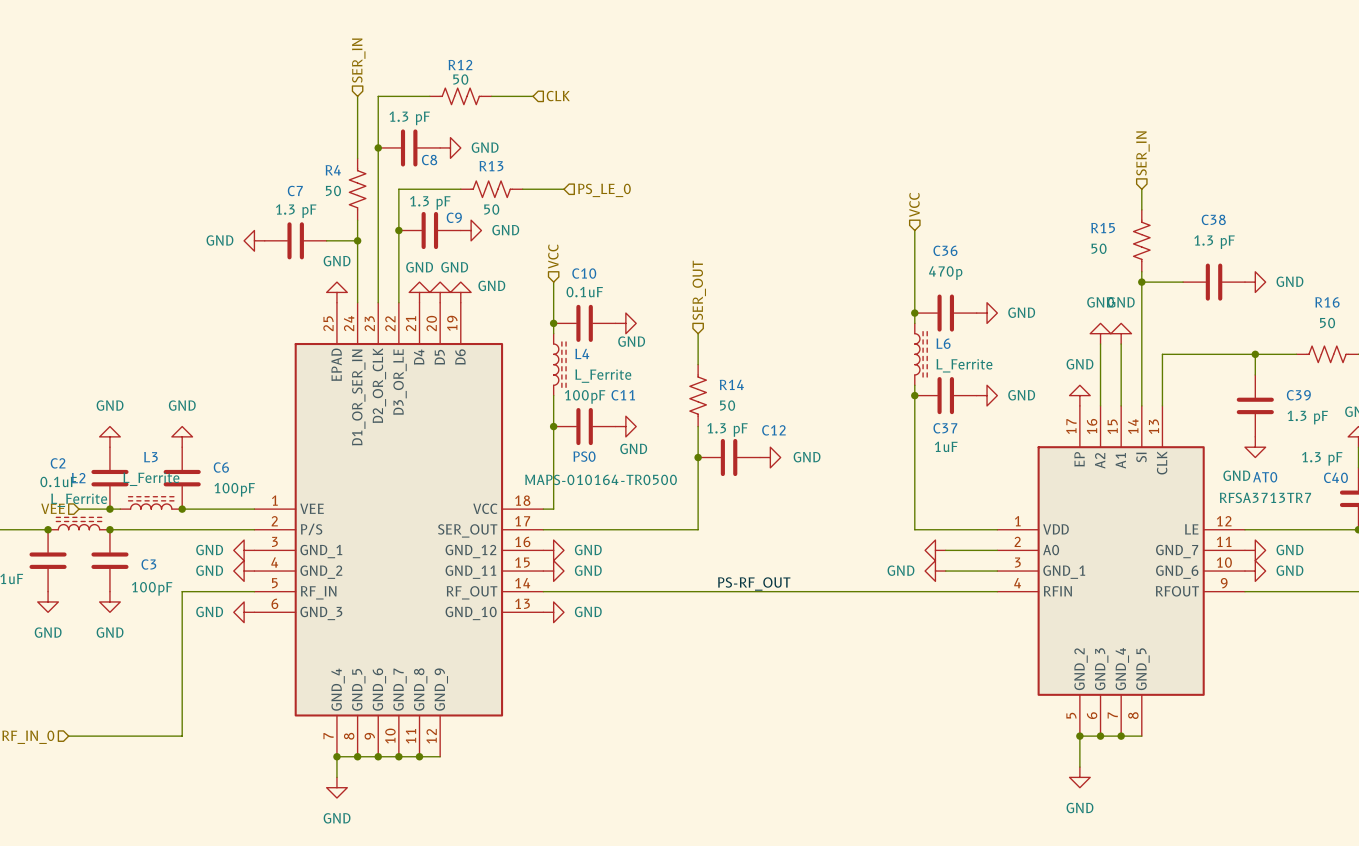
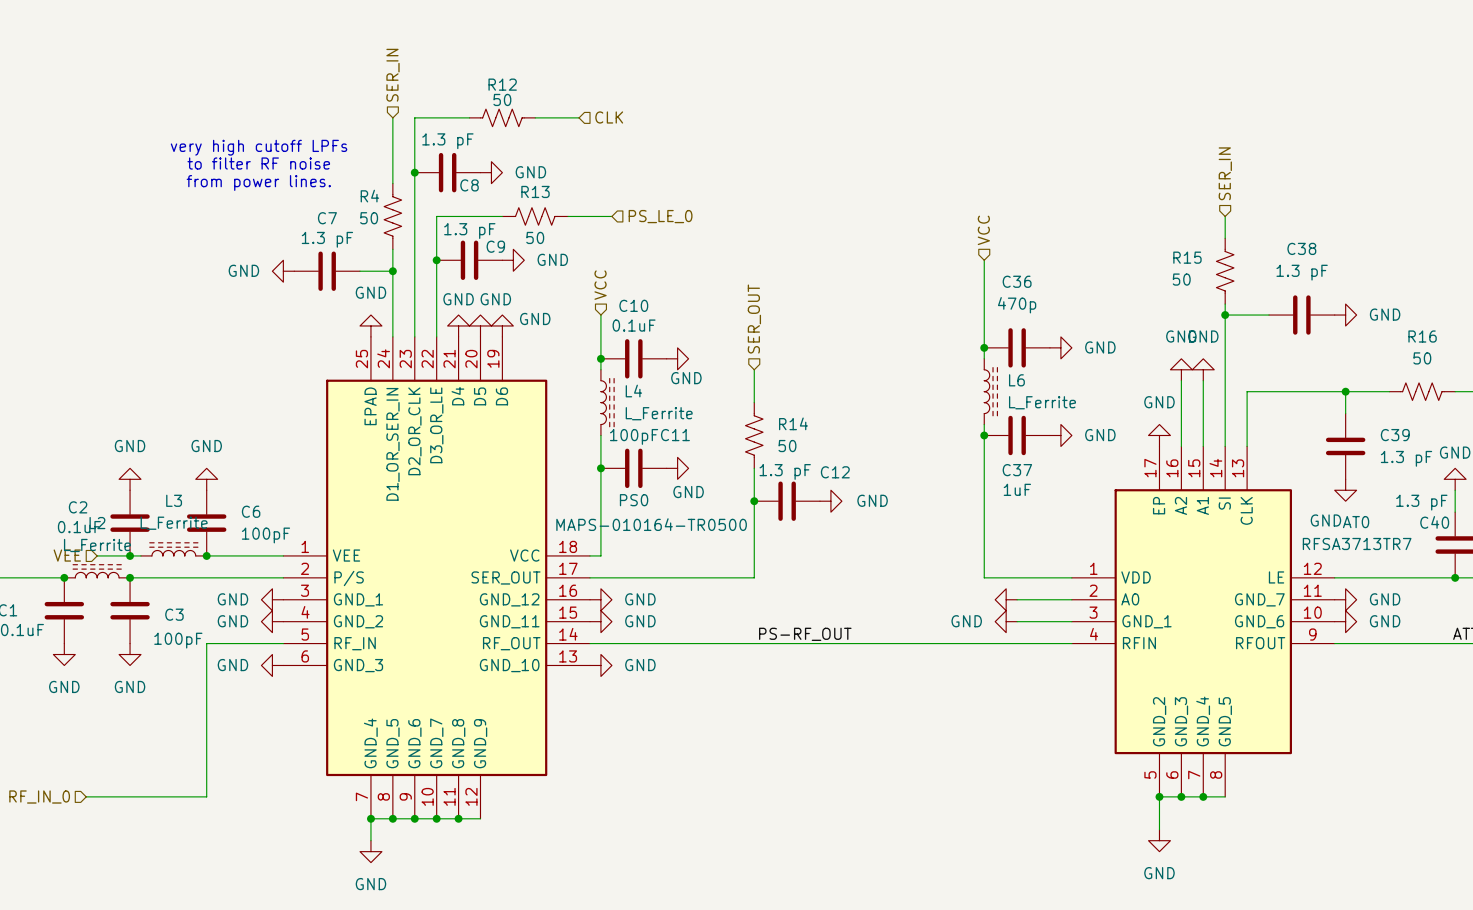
text: none -> very high cutoff LPFs (259, 147)
text: none -> to filter RF noise (258, 163)
text: none -> from power lines. (258, 182)

